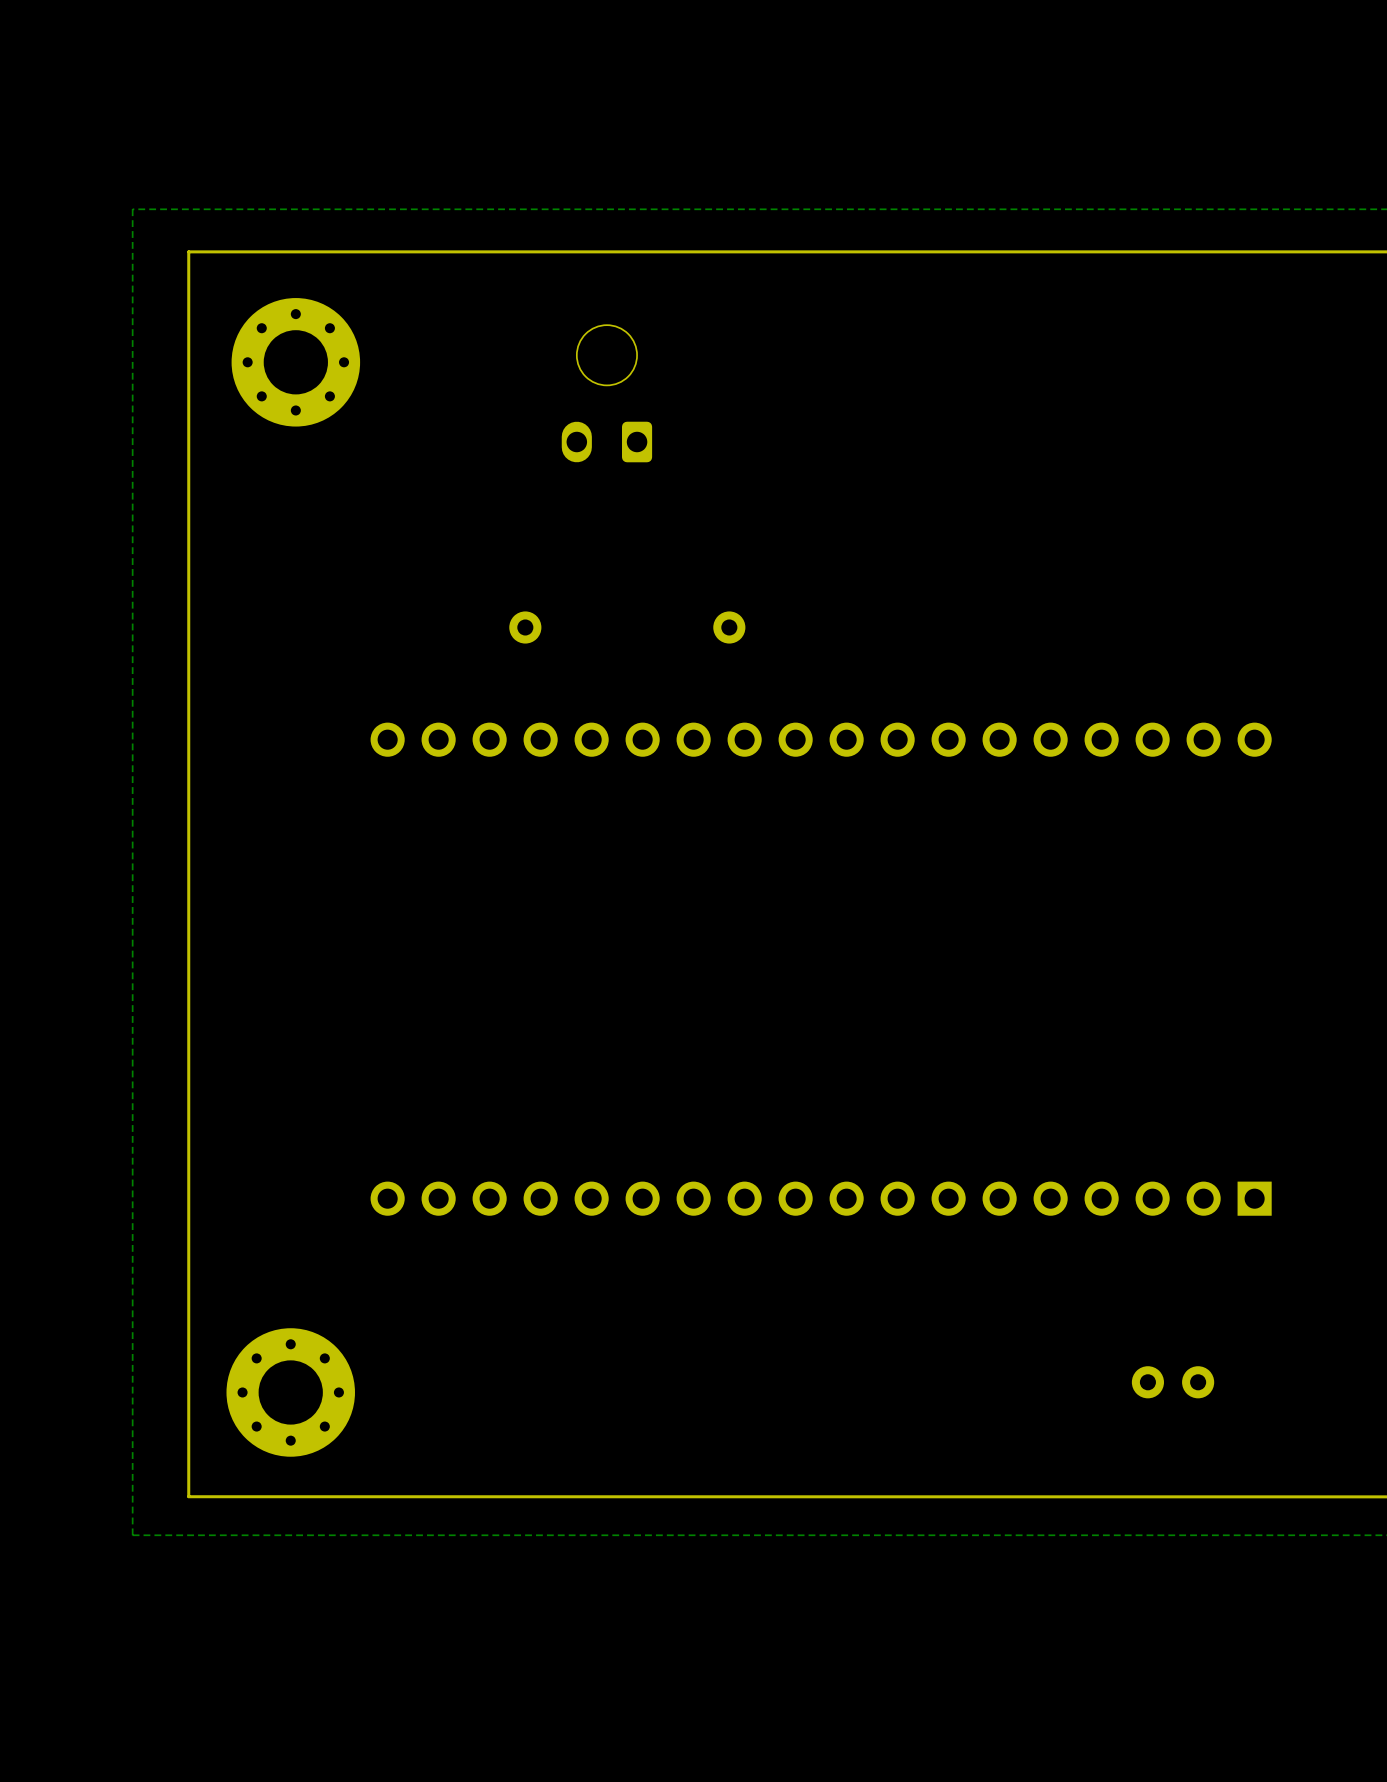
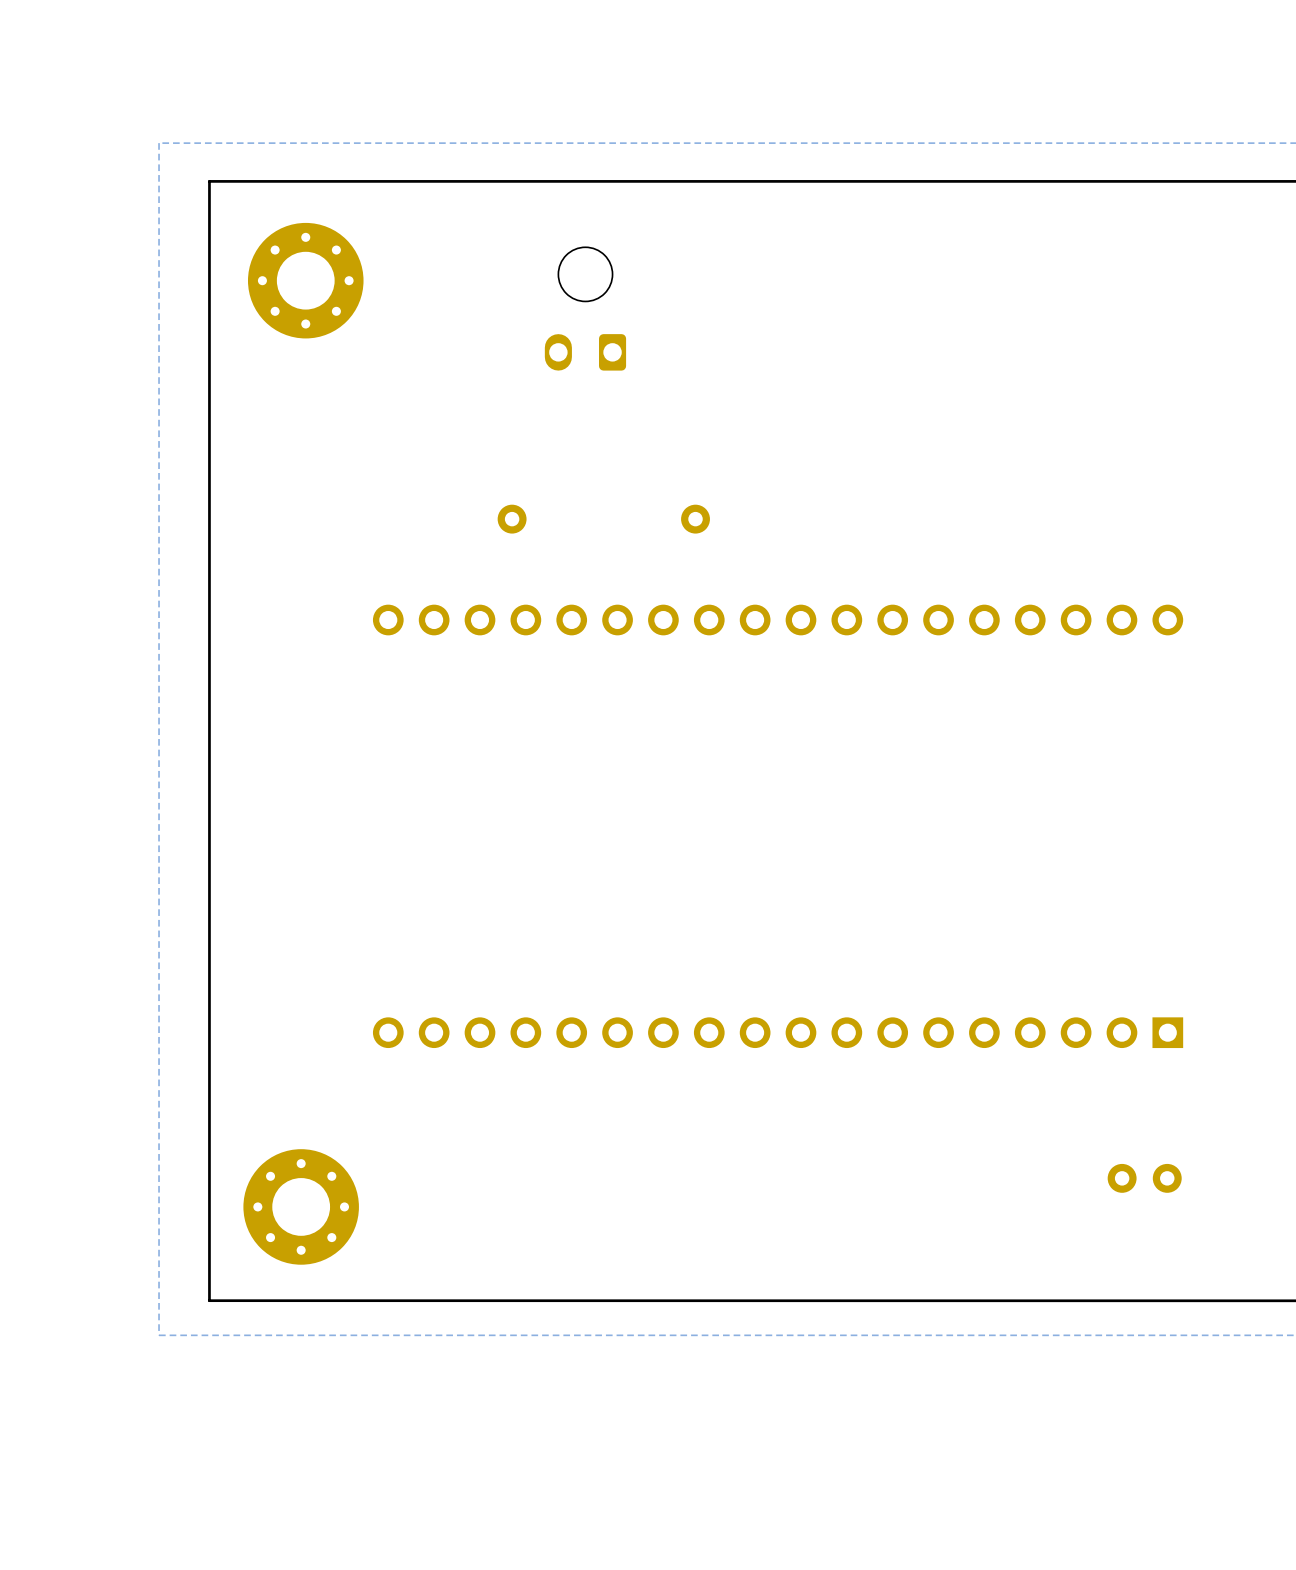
part position: (1173, 1382) -> (1144, 1178)

